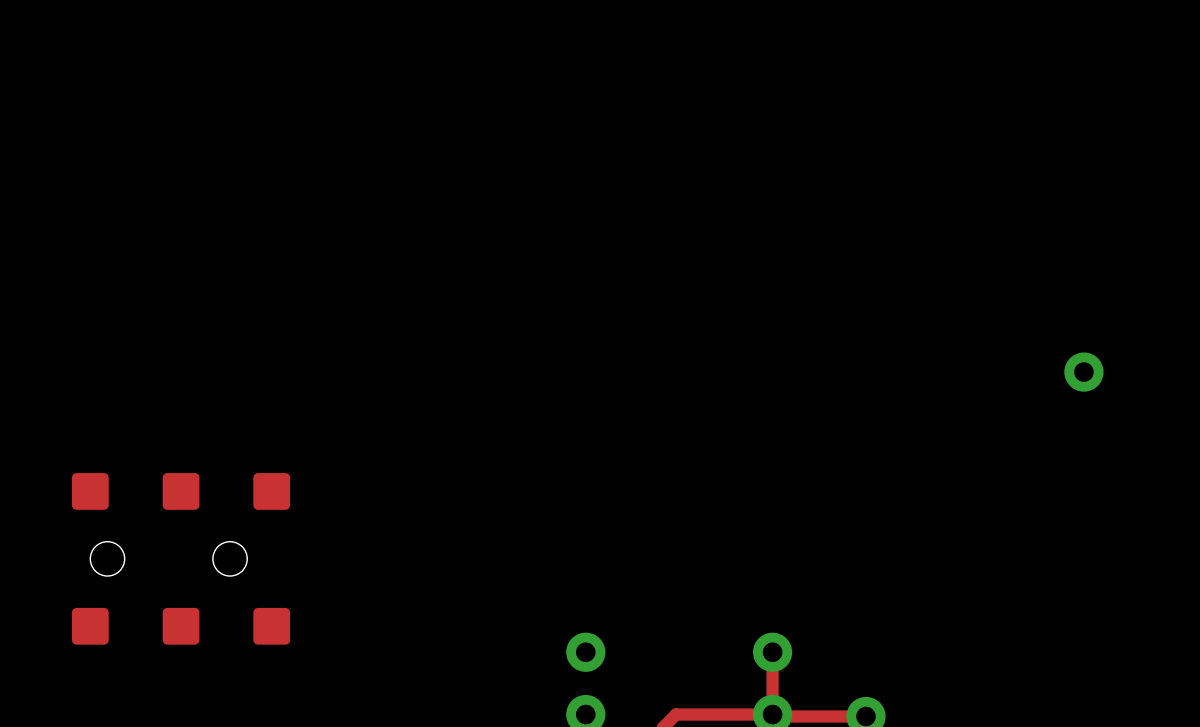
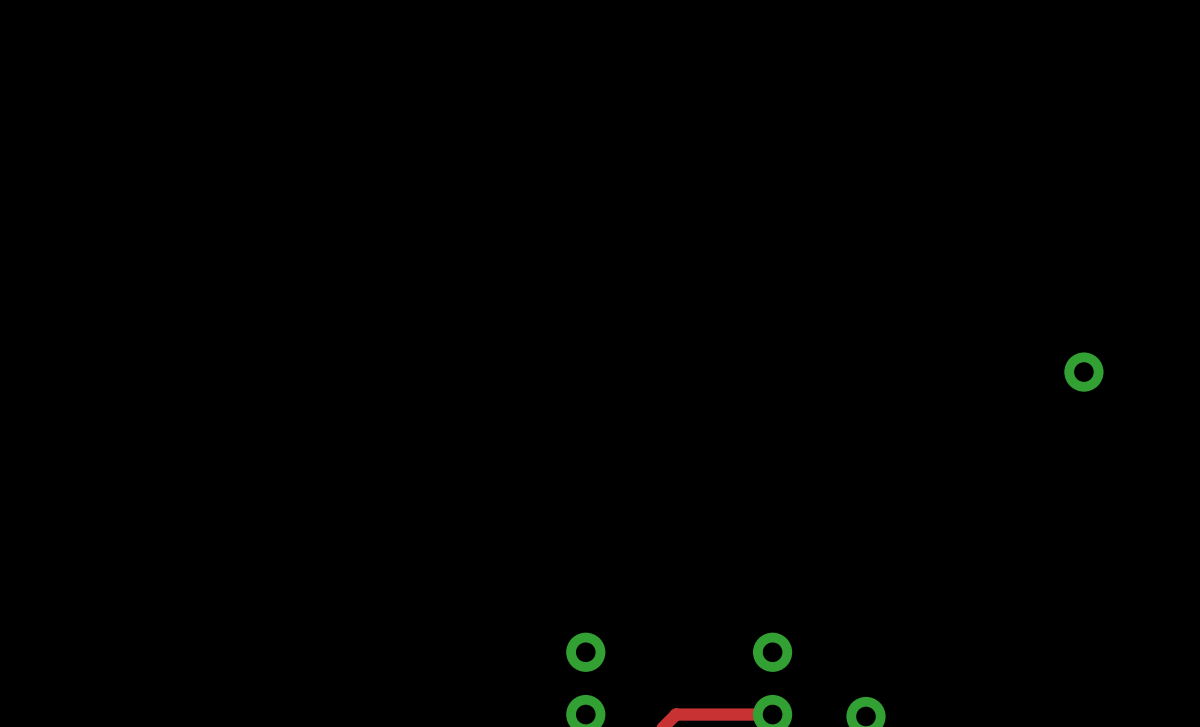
part: (181, 558) -> none
top track: (772, 652) (772, 714) (774, 716) (865, 716) -> none

